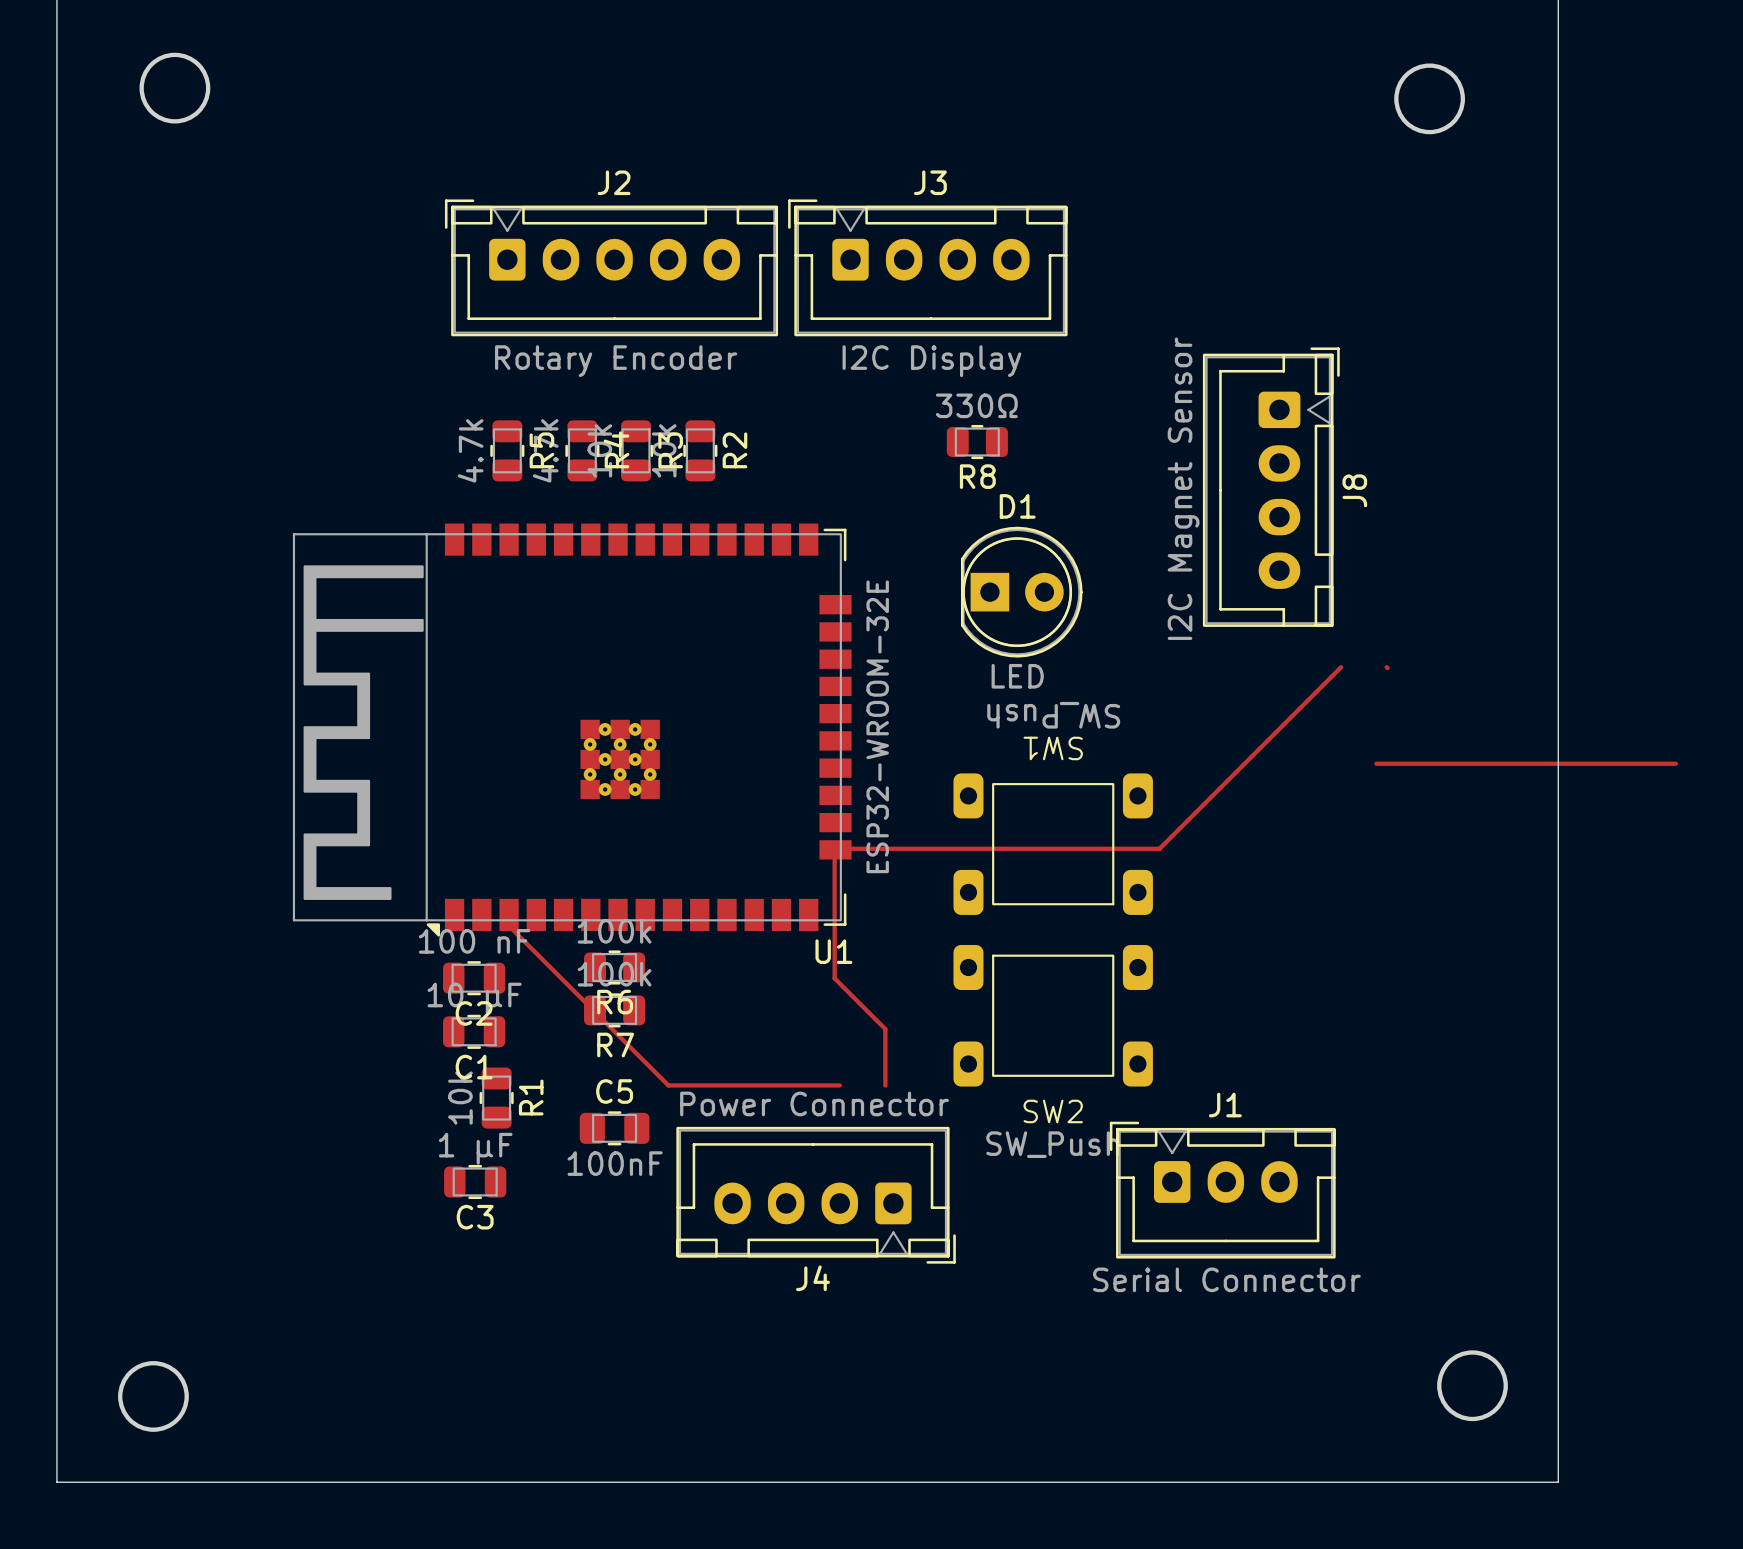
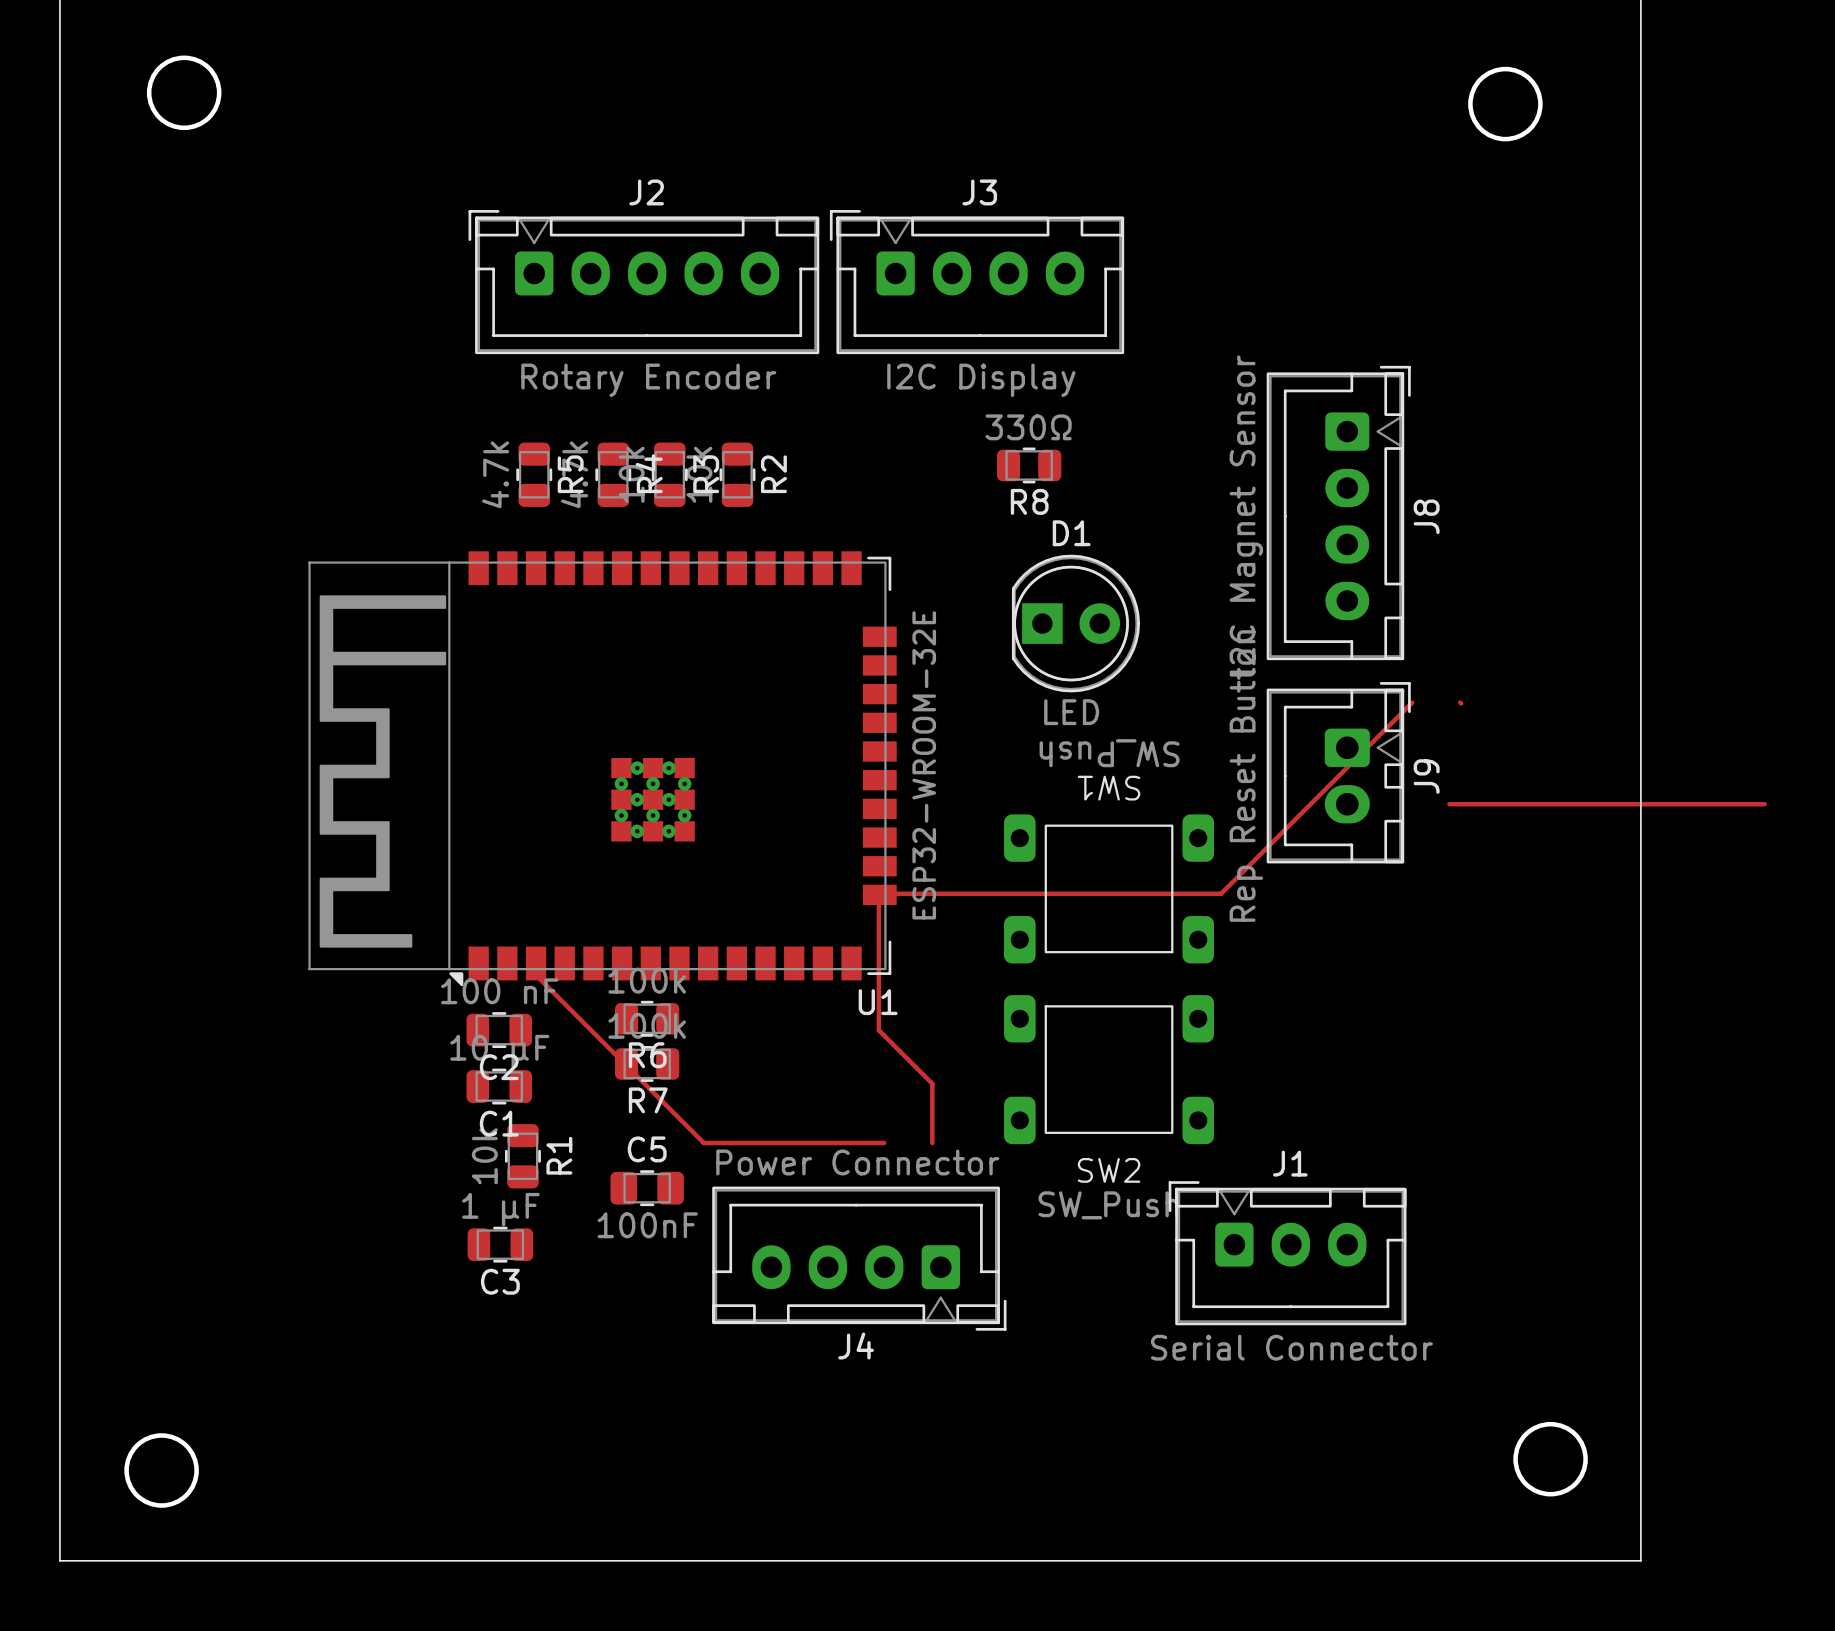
J9: none -> Rep Reset Button (1338, 772)

